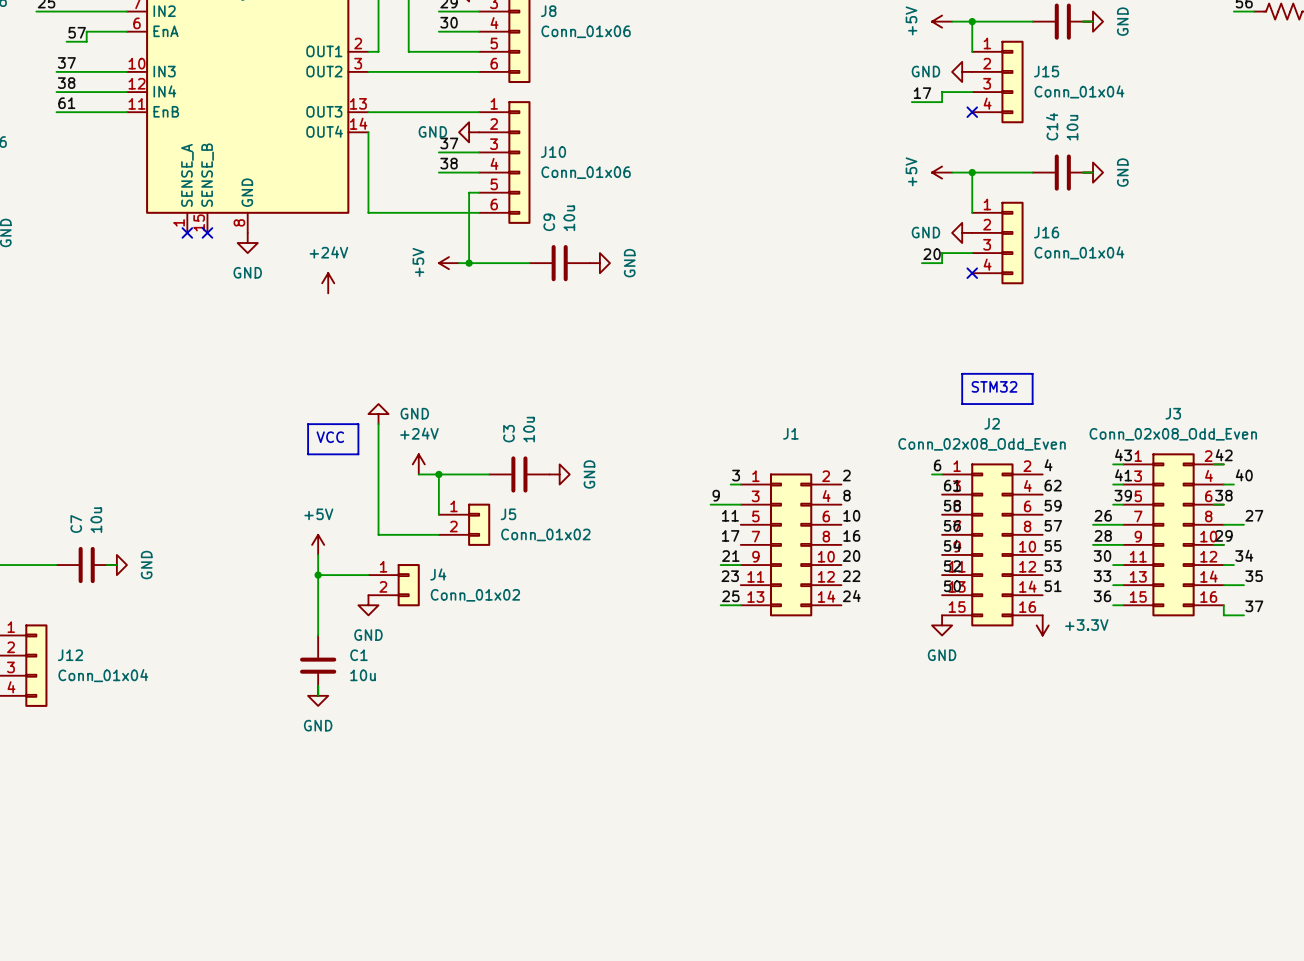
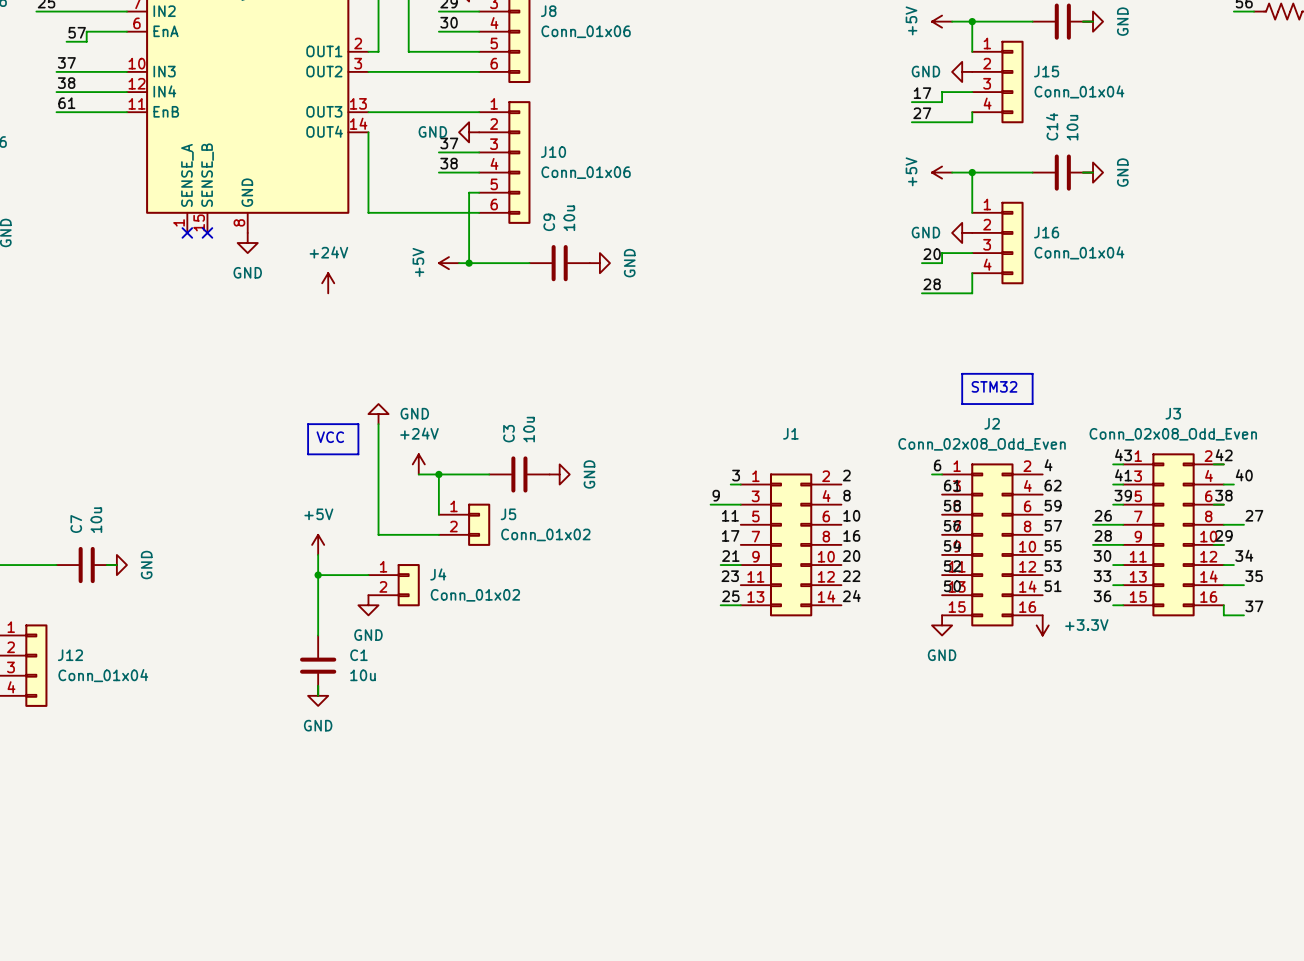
wire: none -> (972, 112) (972, 122) (911, 122)
no-connect mark: (972, 112) -> none
label: none -> 27 (922, 113)
wire: none -> (972, 273) (972, 293) (921, 293)
no-connect mark: (972, 273) -> none
label: none -> 28 (932, 284)

